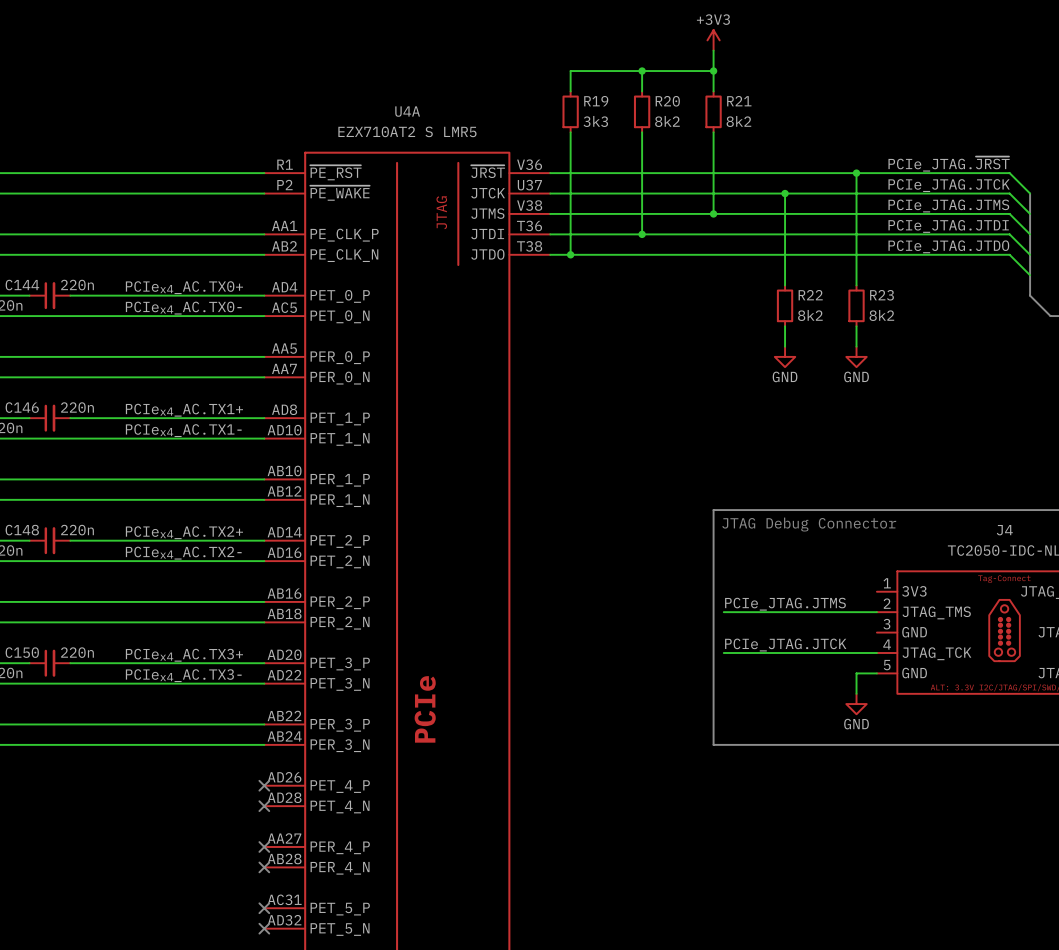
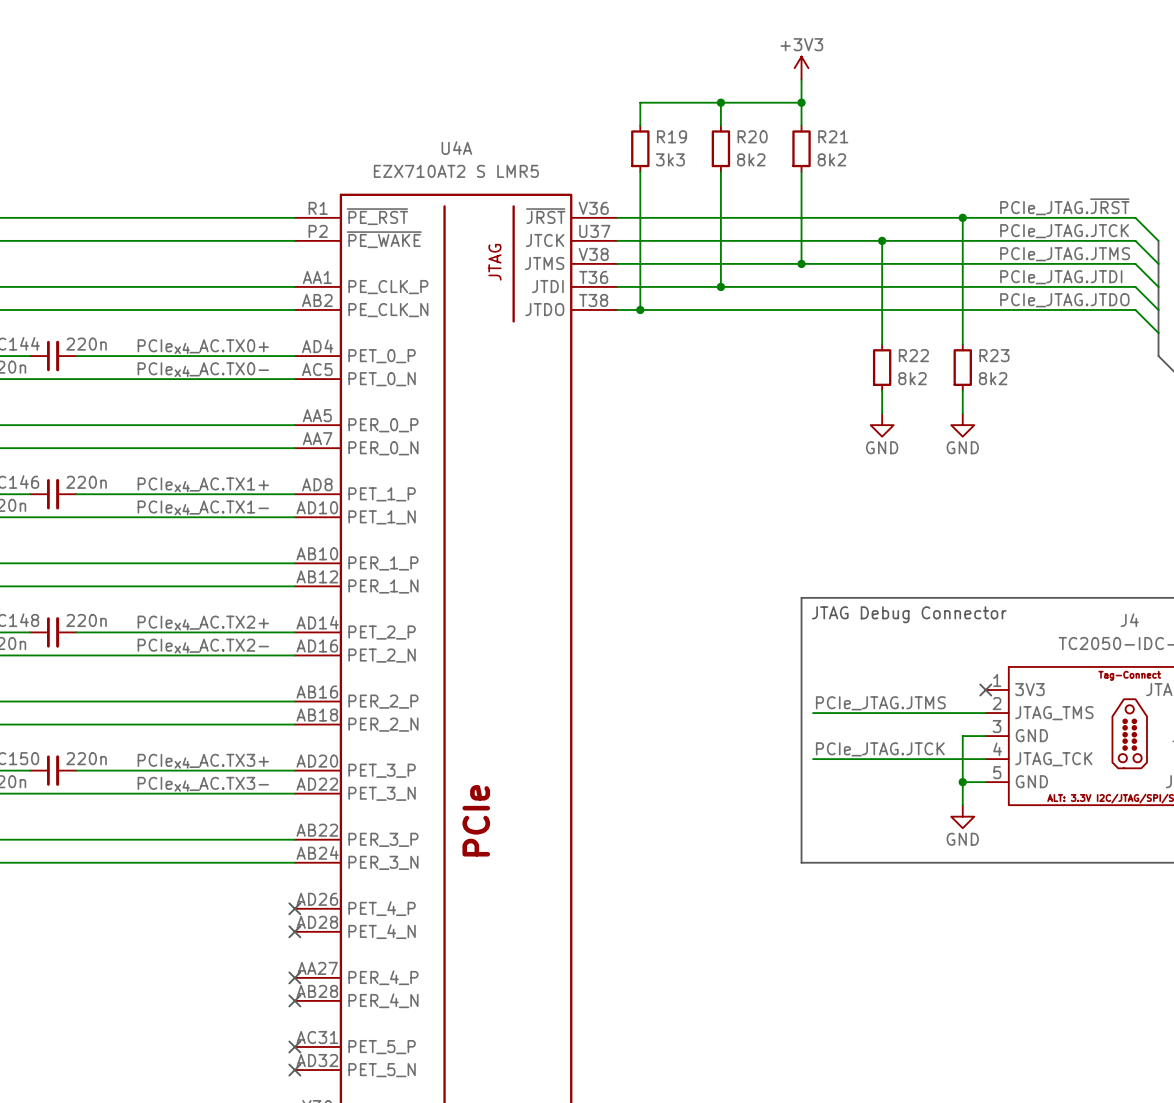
no-connect mark: none -> (985, 690)
wire: none -> (985, 736) (962, 736) (962, 782)
junction: none -> (962, 782)

